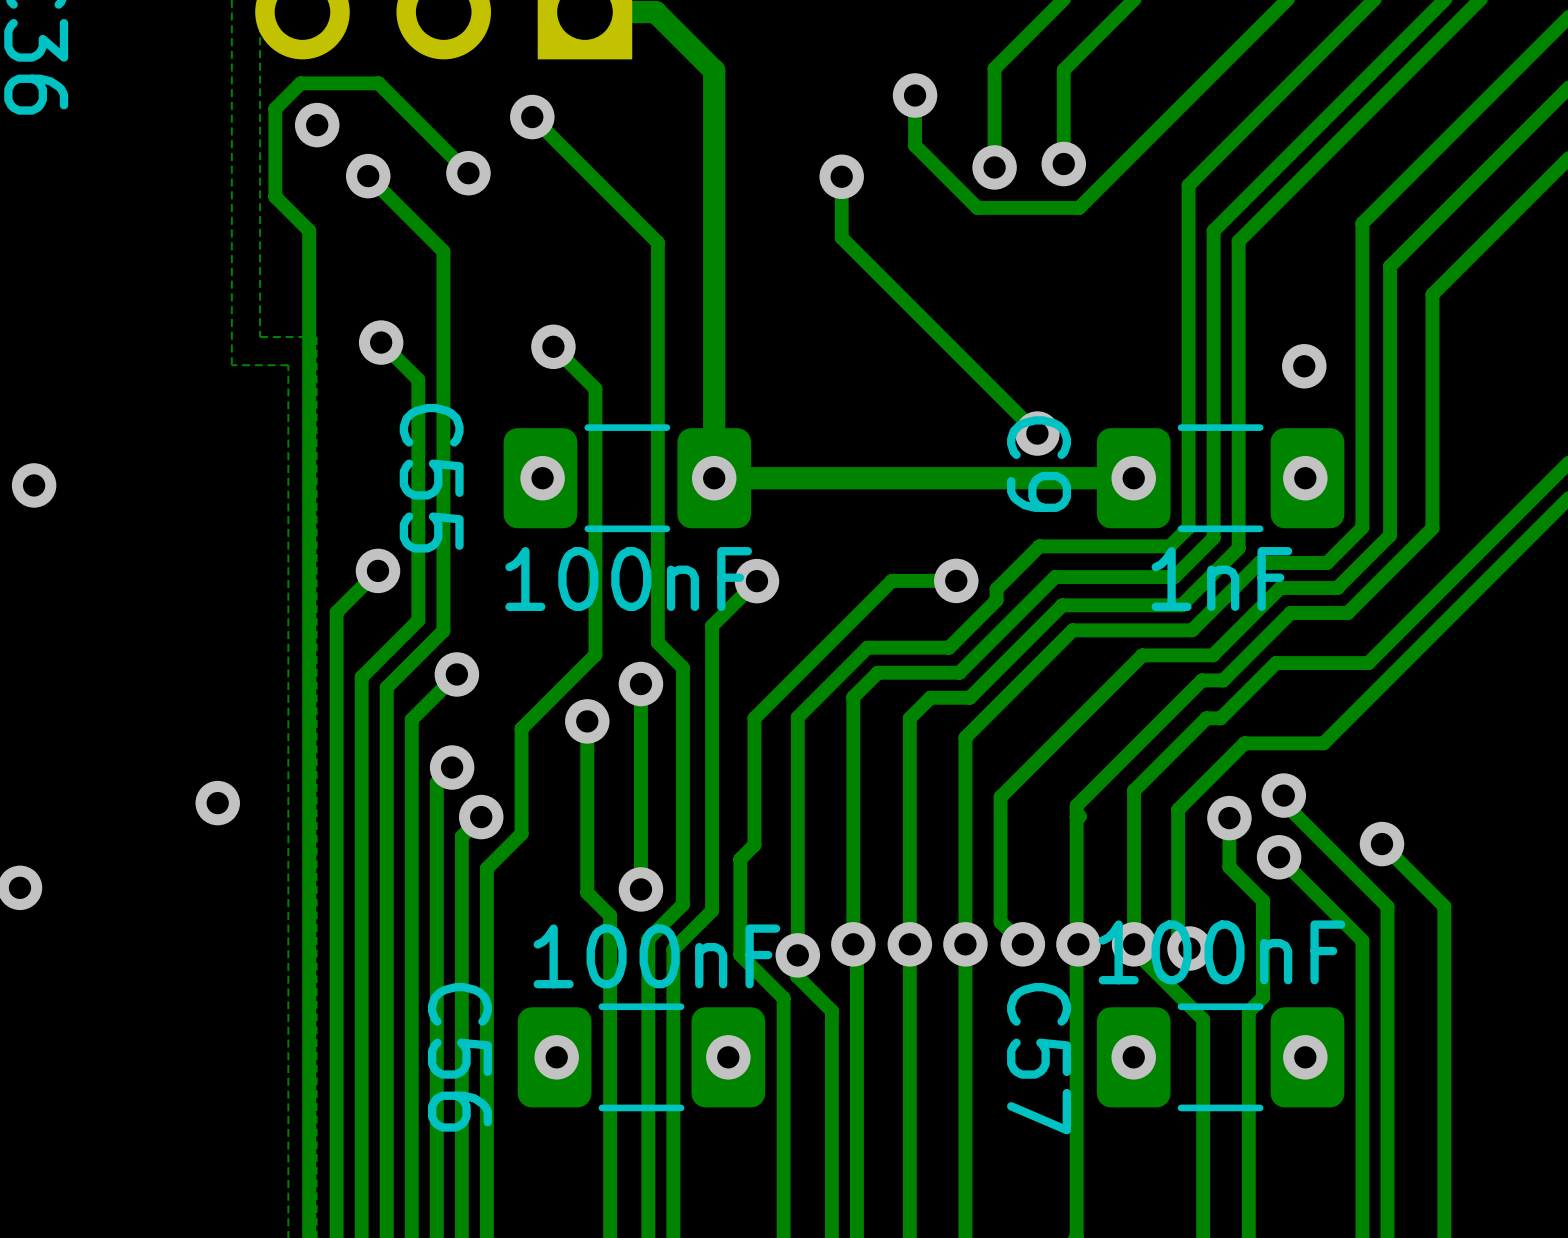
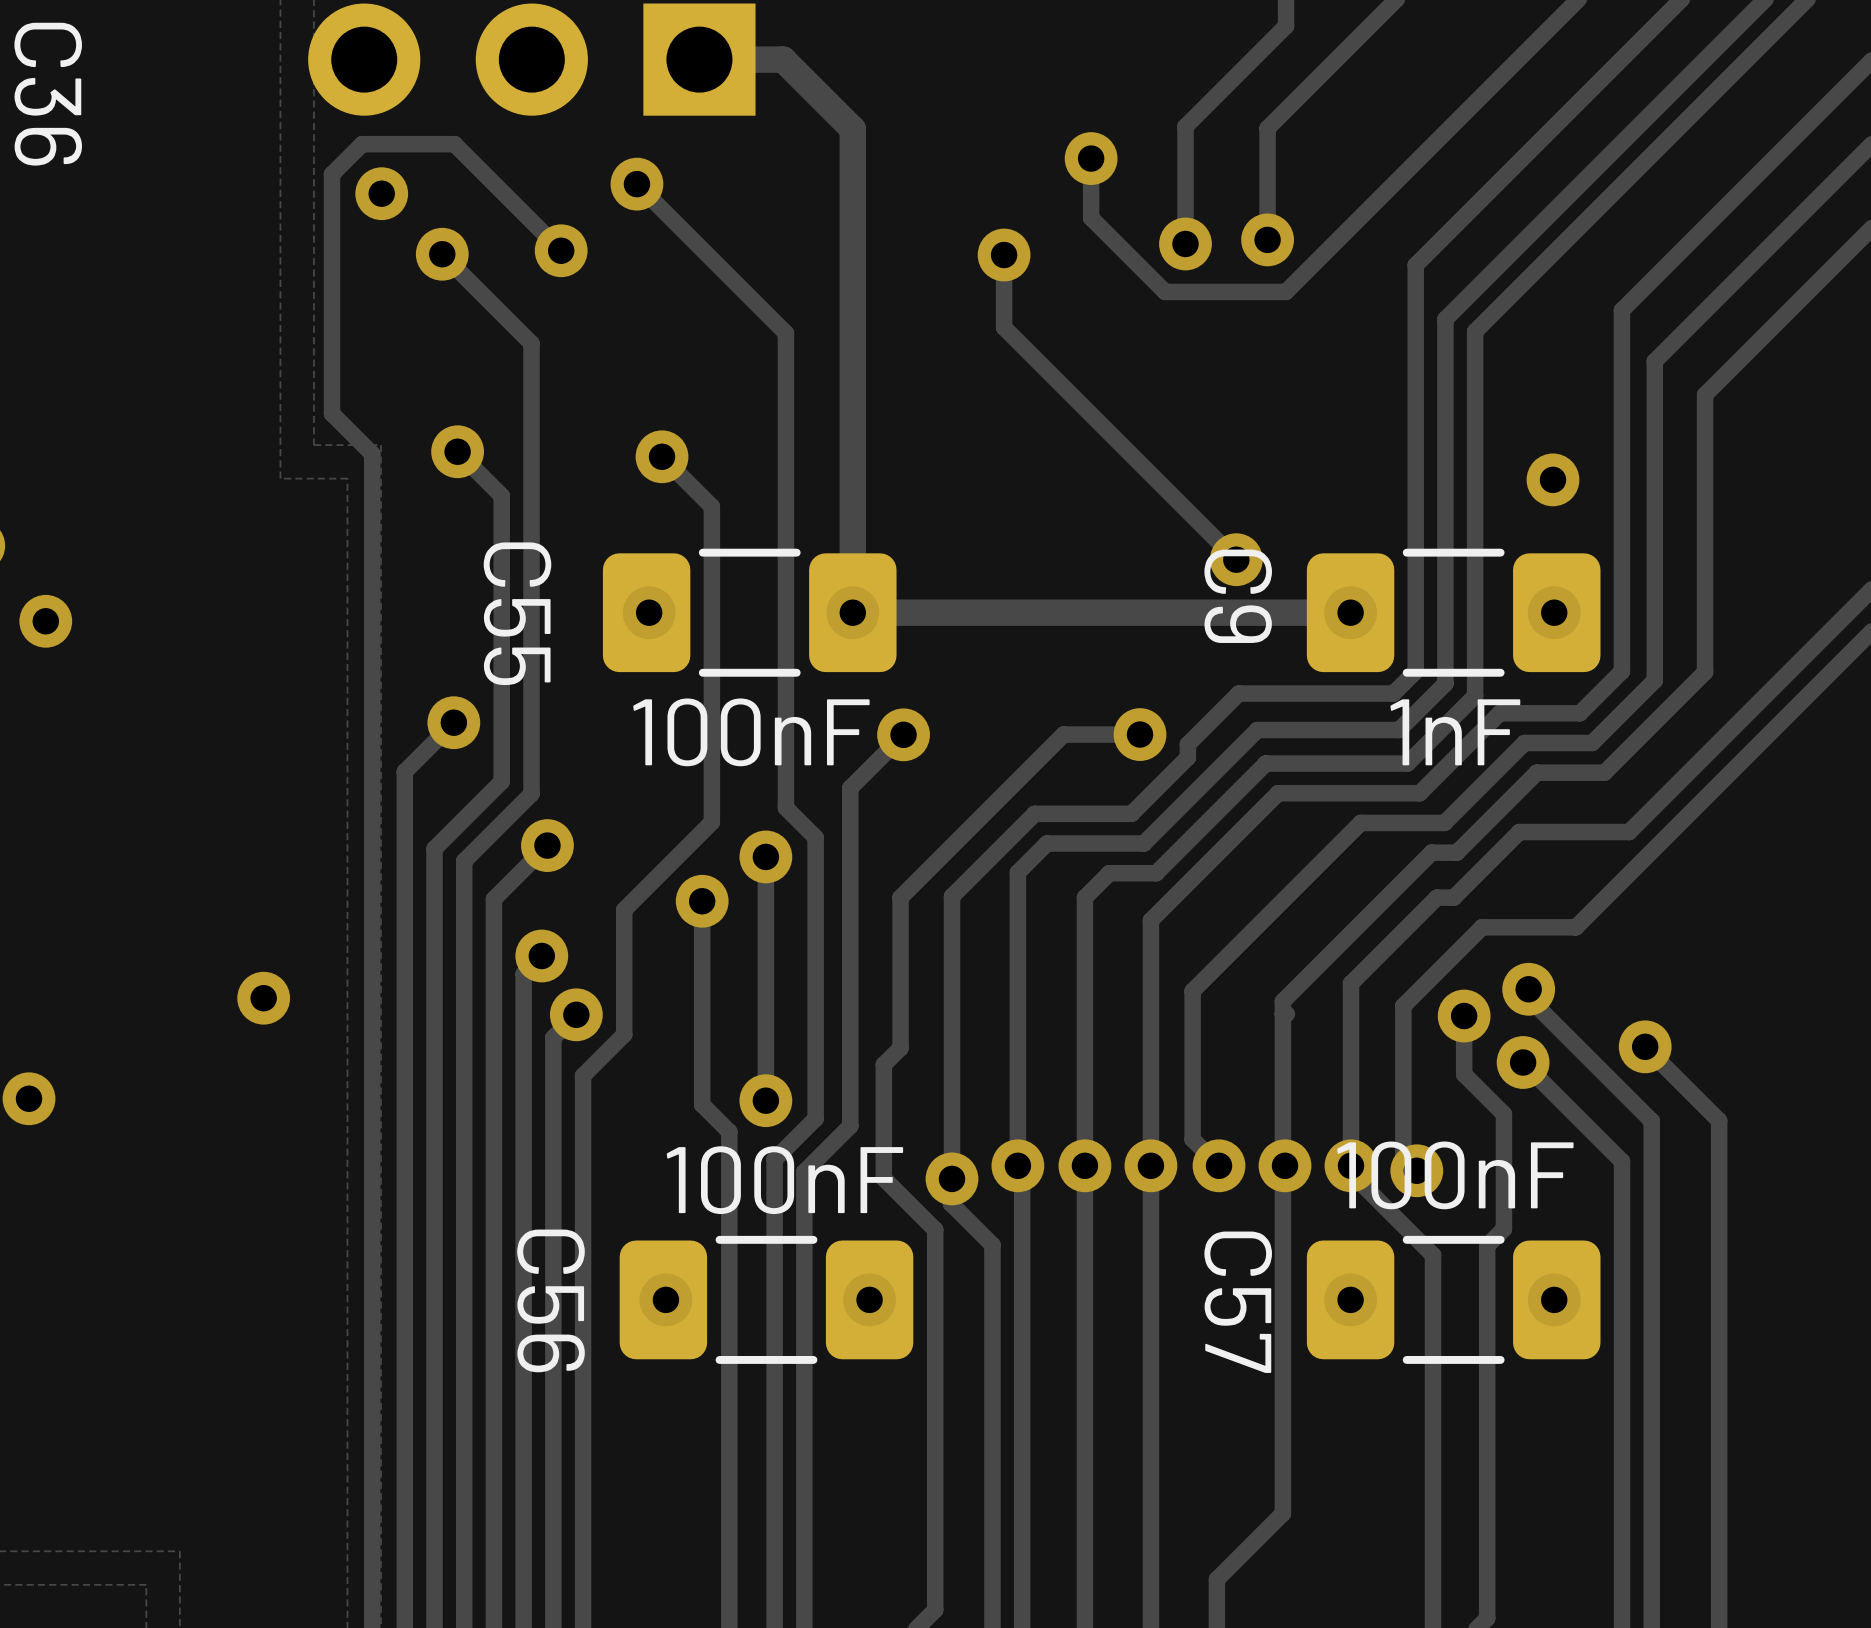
track: (275, 196) (309, 230) (309, 344) -> (332, 278) (332, 413) (372, 453)

